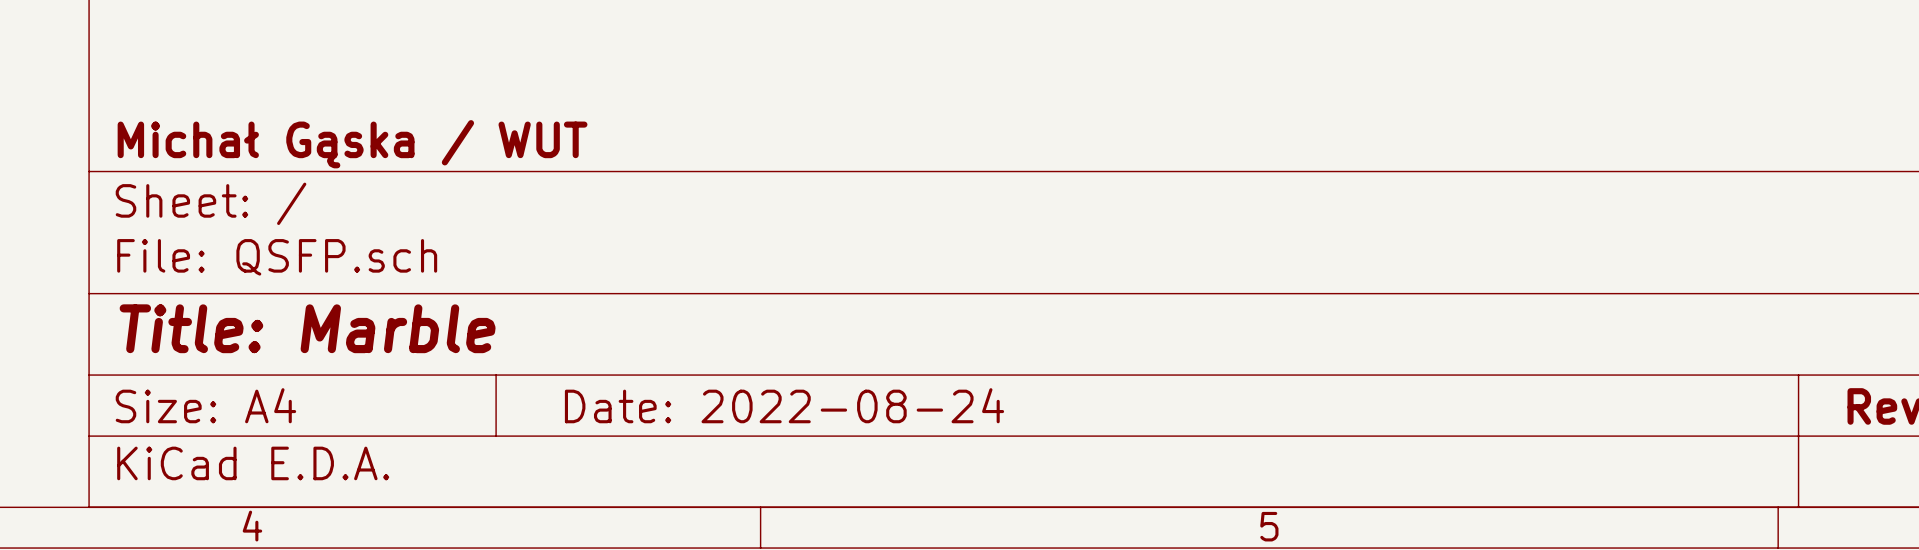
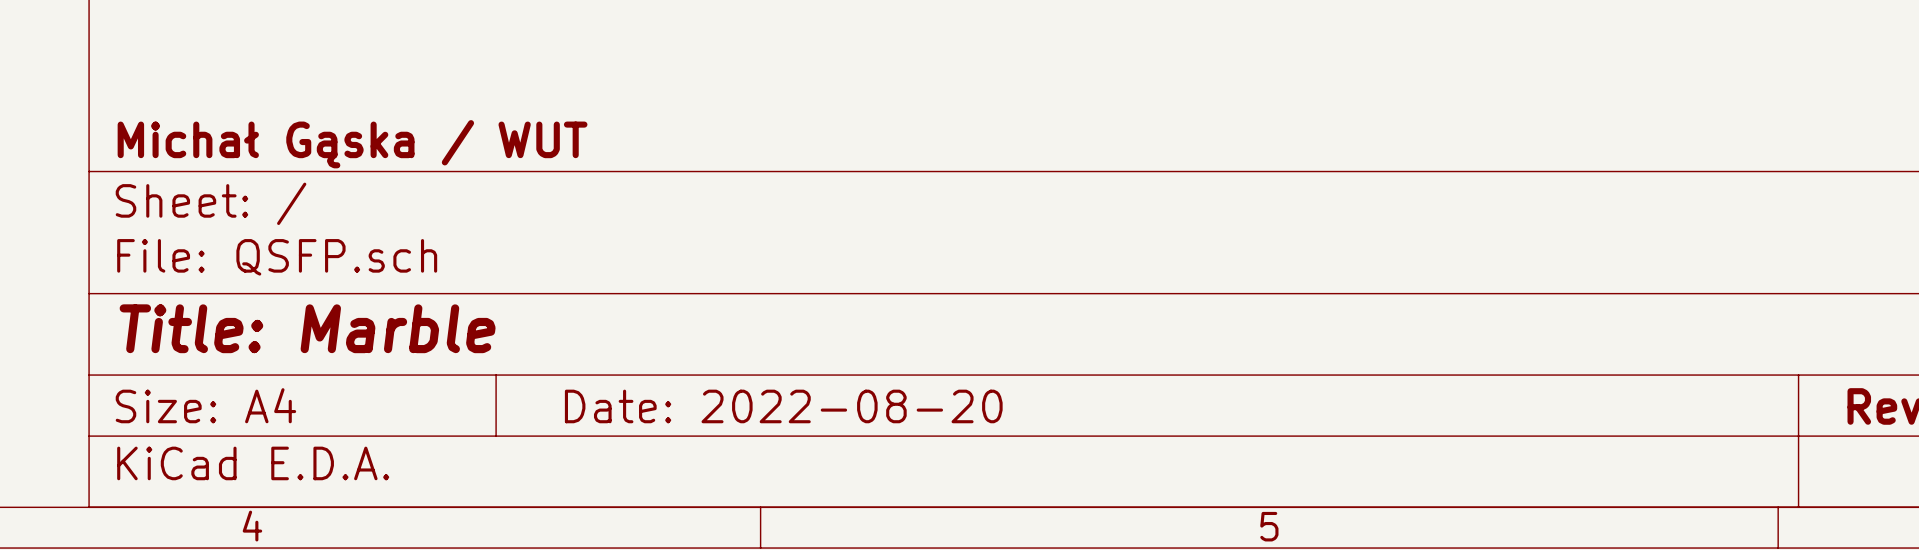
title block: Date: 2022-08-24 (784, 405) -> Date: 2022-08-20 (783, 406)

